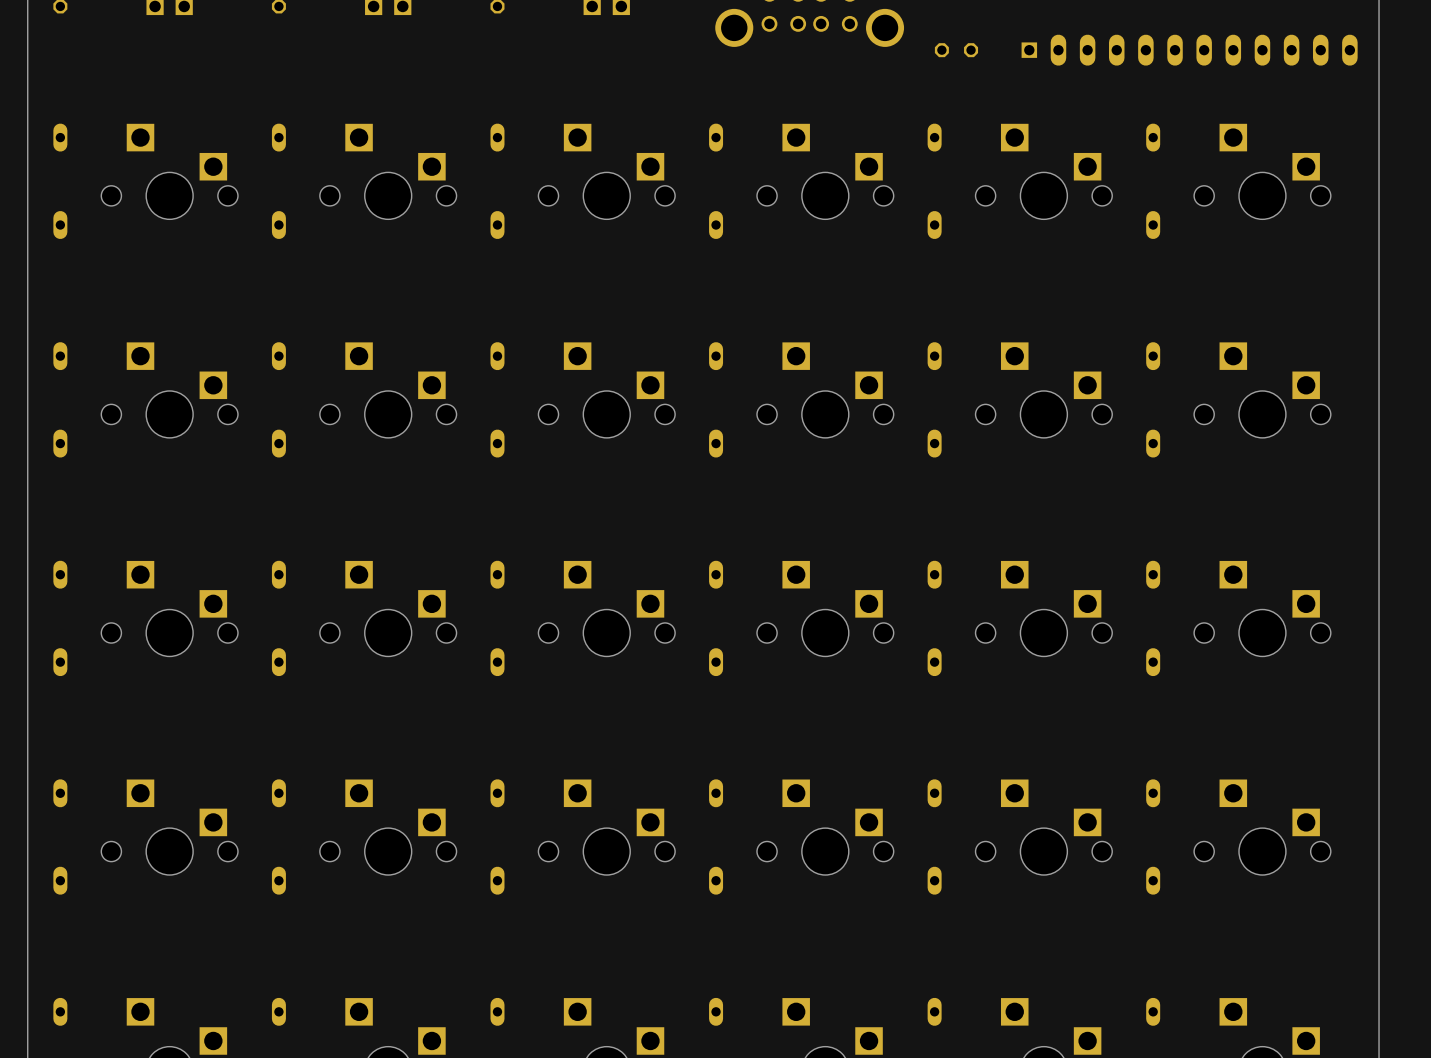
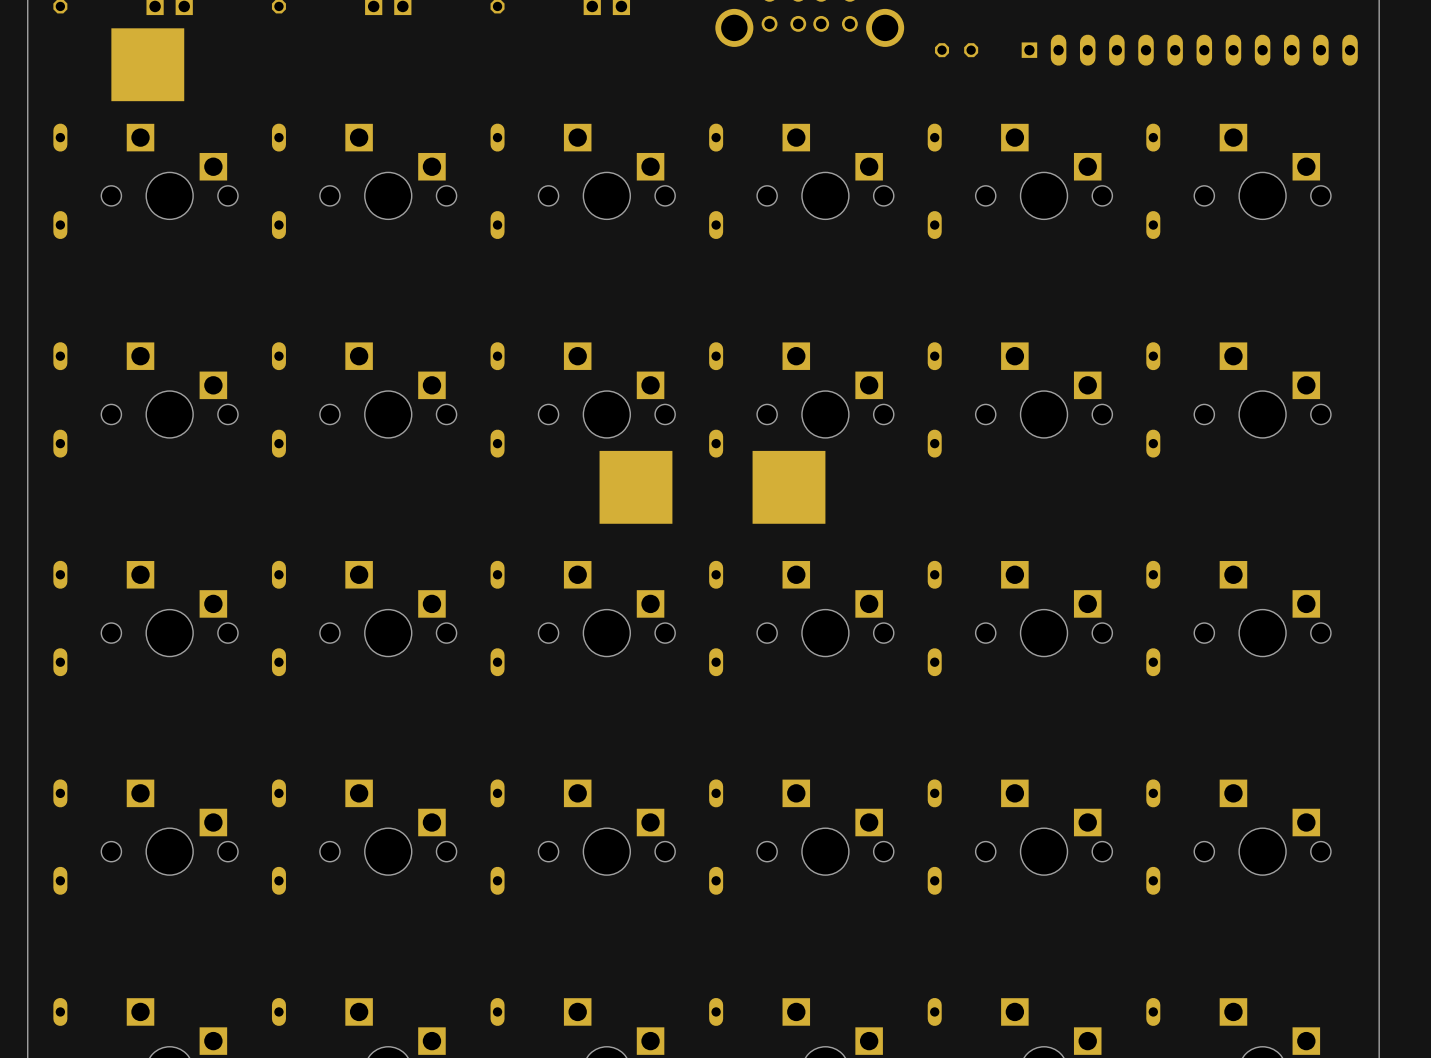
part: none -> (147, 64)
part: none -> (635, 487)
part: none -> (788, 487)

